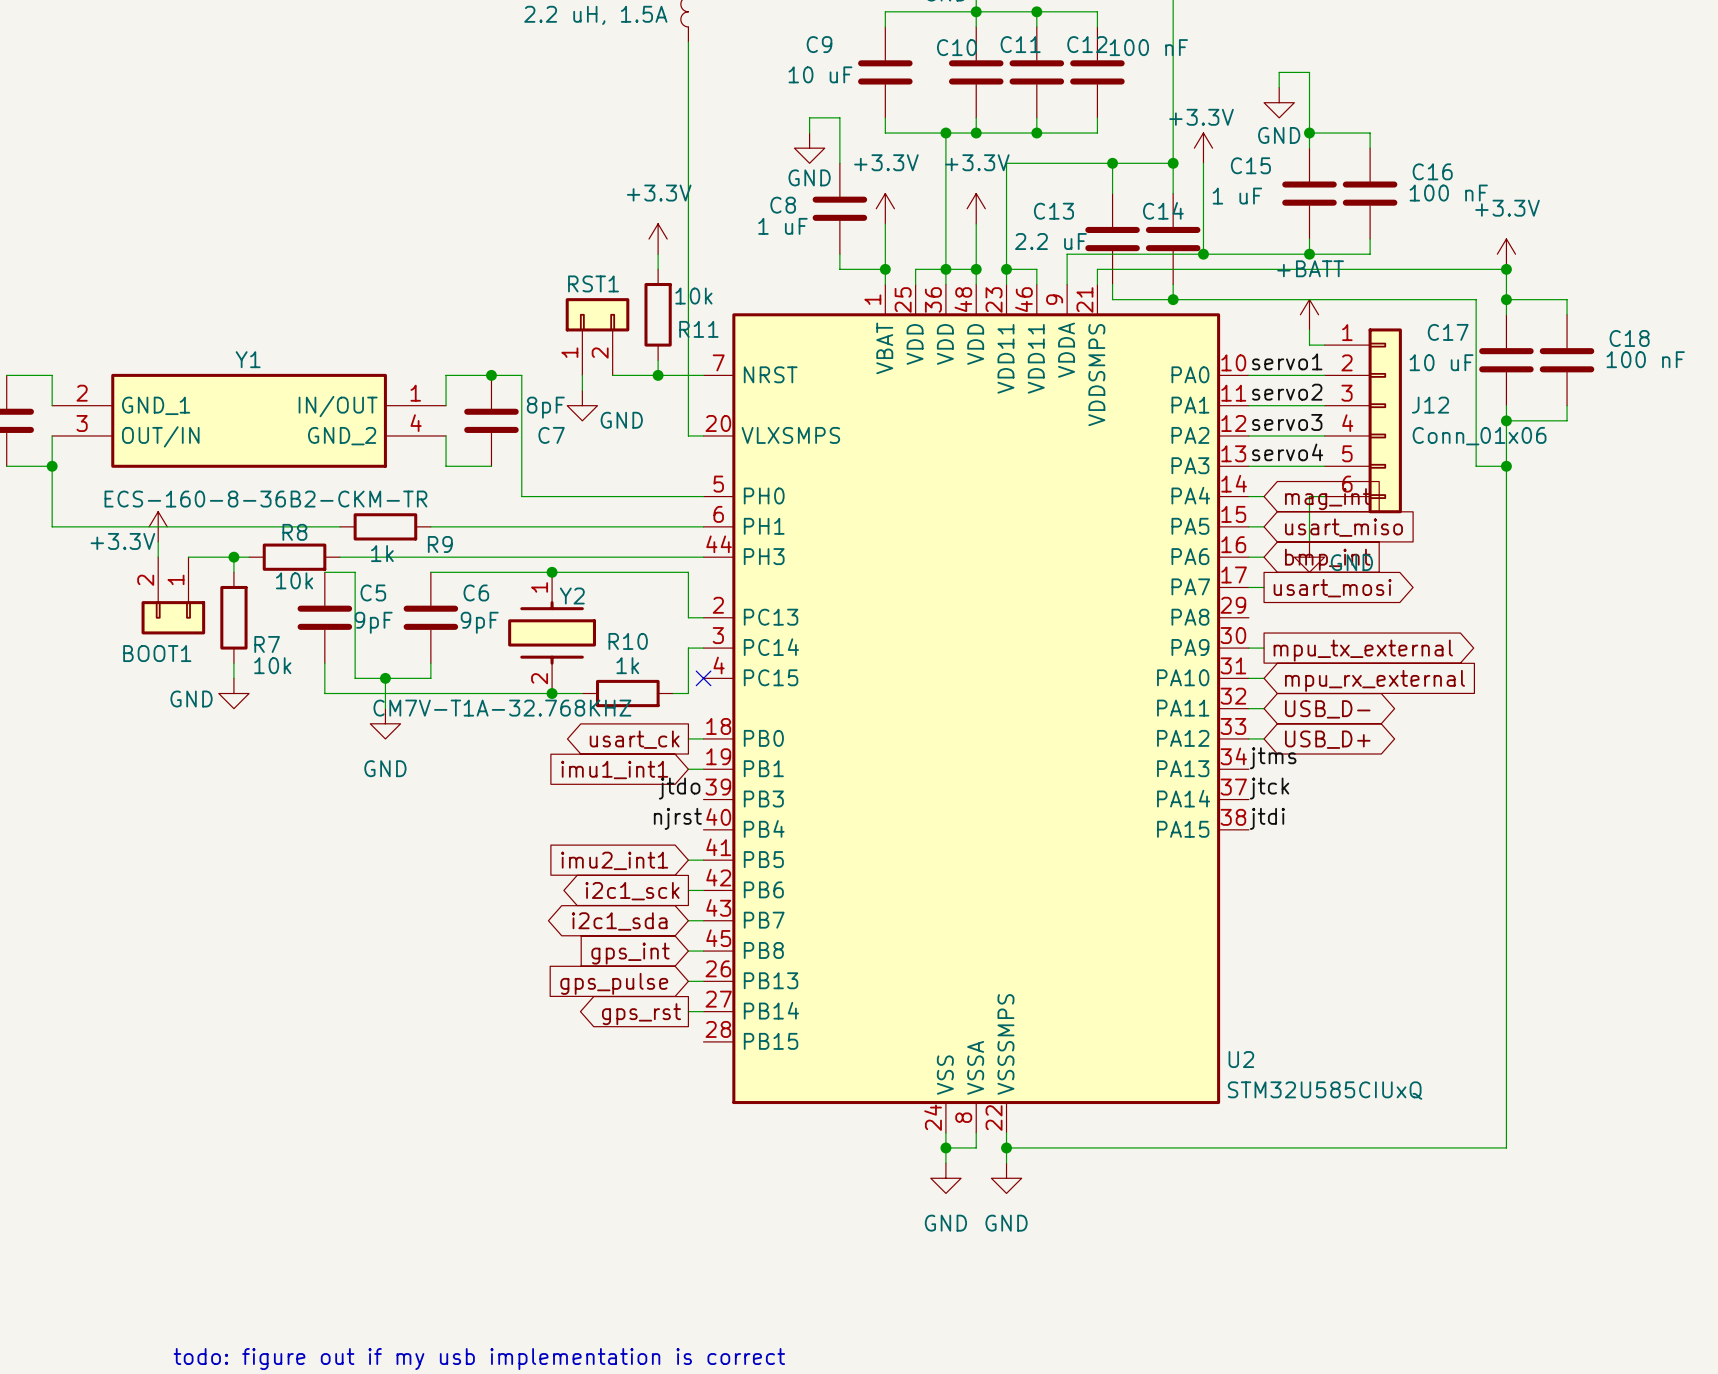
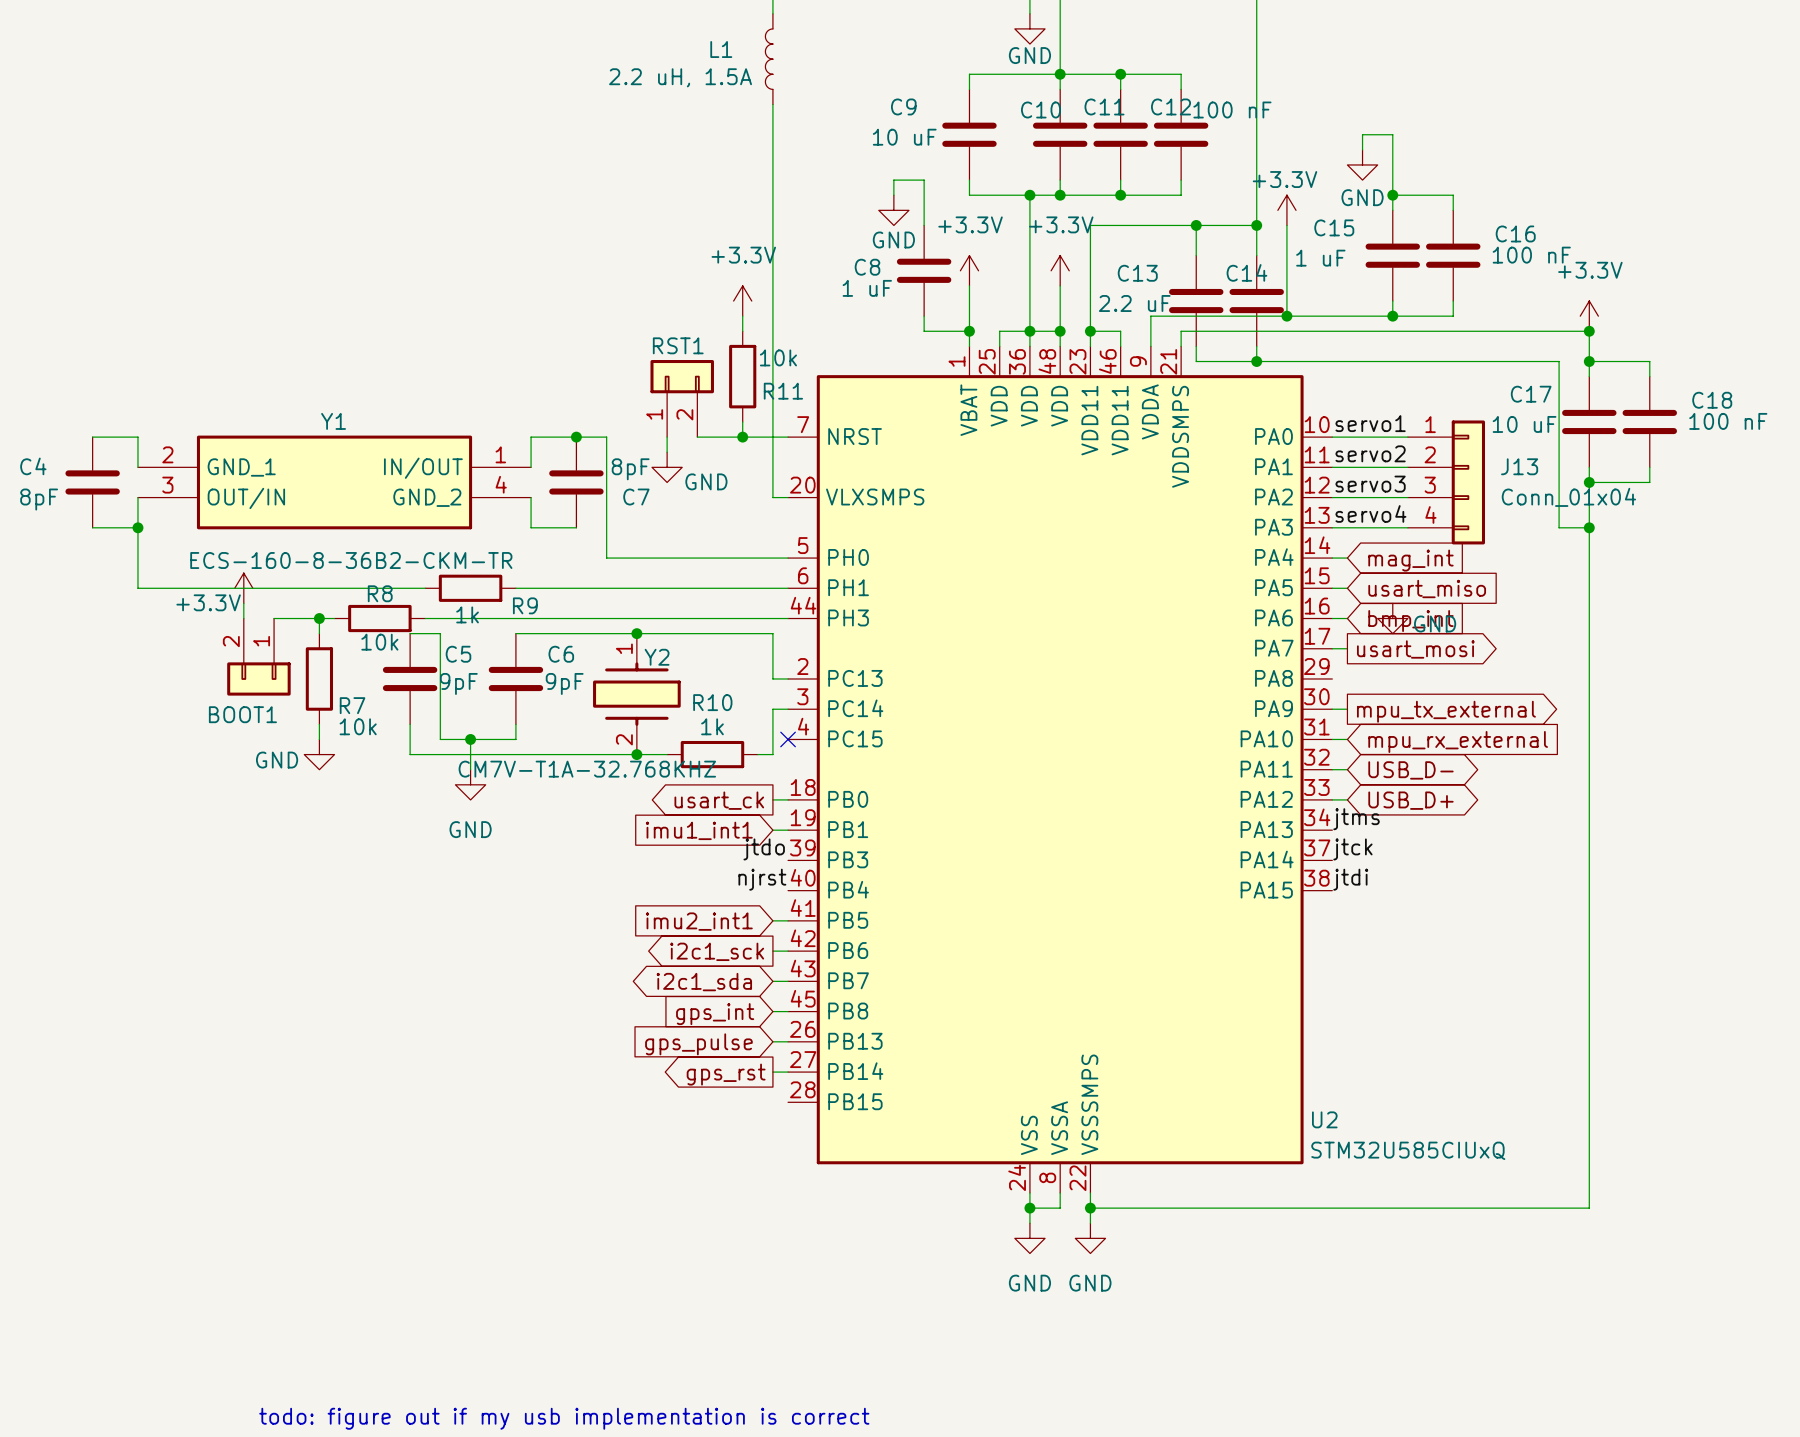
power symbol: +BATT (1309, 314) -> none
wire: (1309, 329) (1309, 345) (1324, 345) -> none
J12: Conn_01x06 (1363, 420) -> none
J13: none -> Conn_01x04 (1446, 482)
wire: (1324, 496) (1309, 496) (1309, 542) -> none

